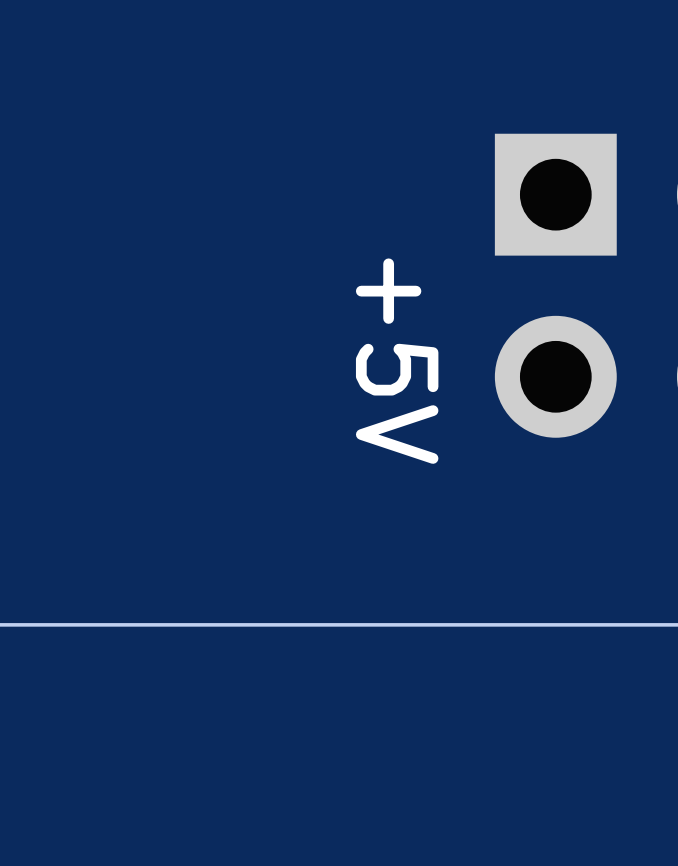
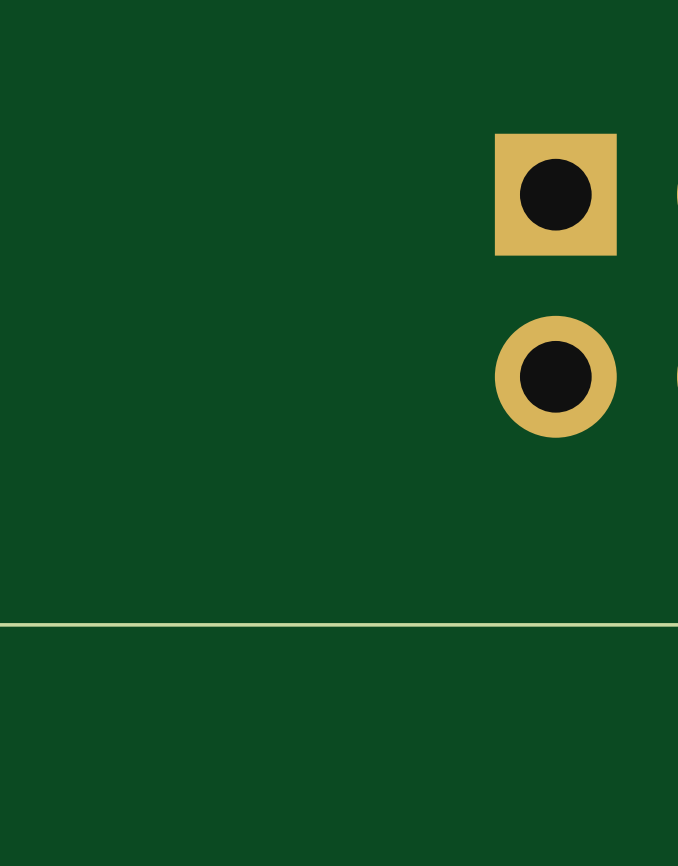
text: +5V (397, 361) -> none

